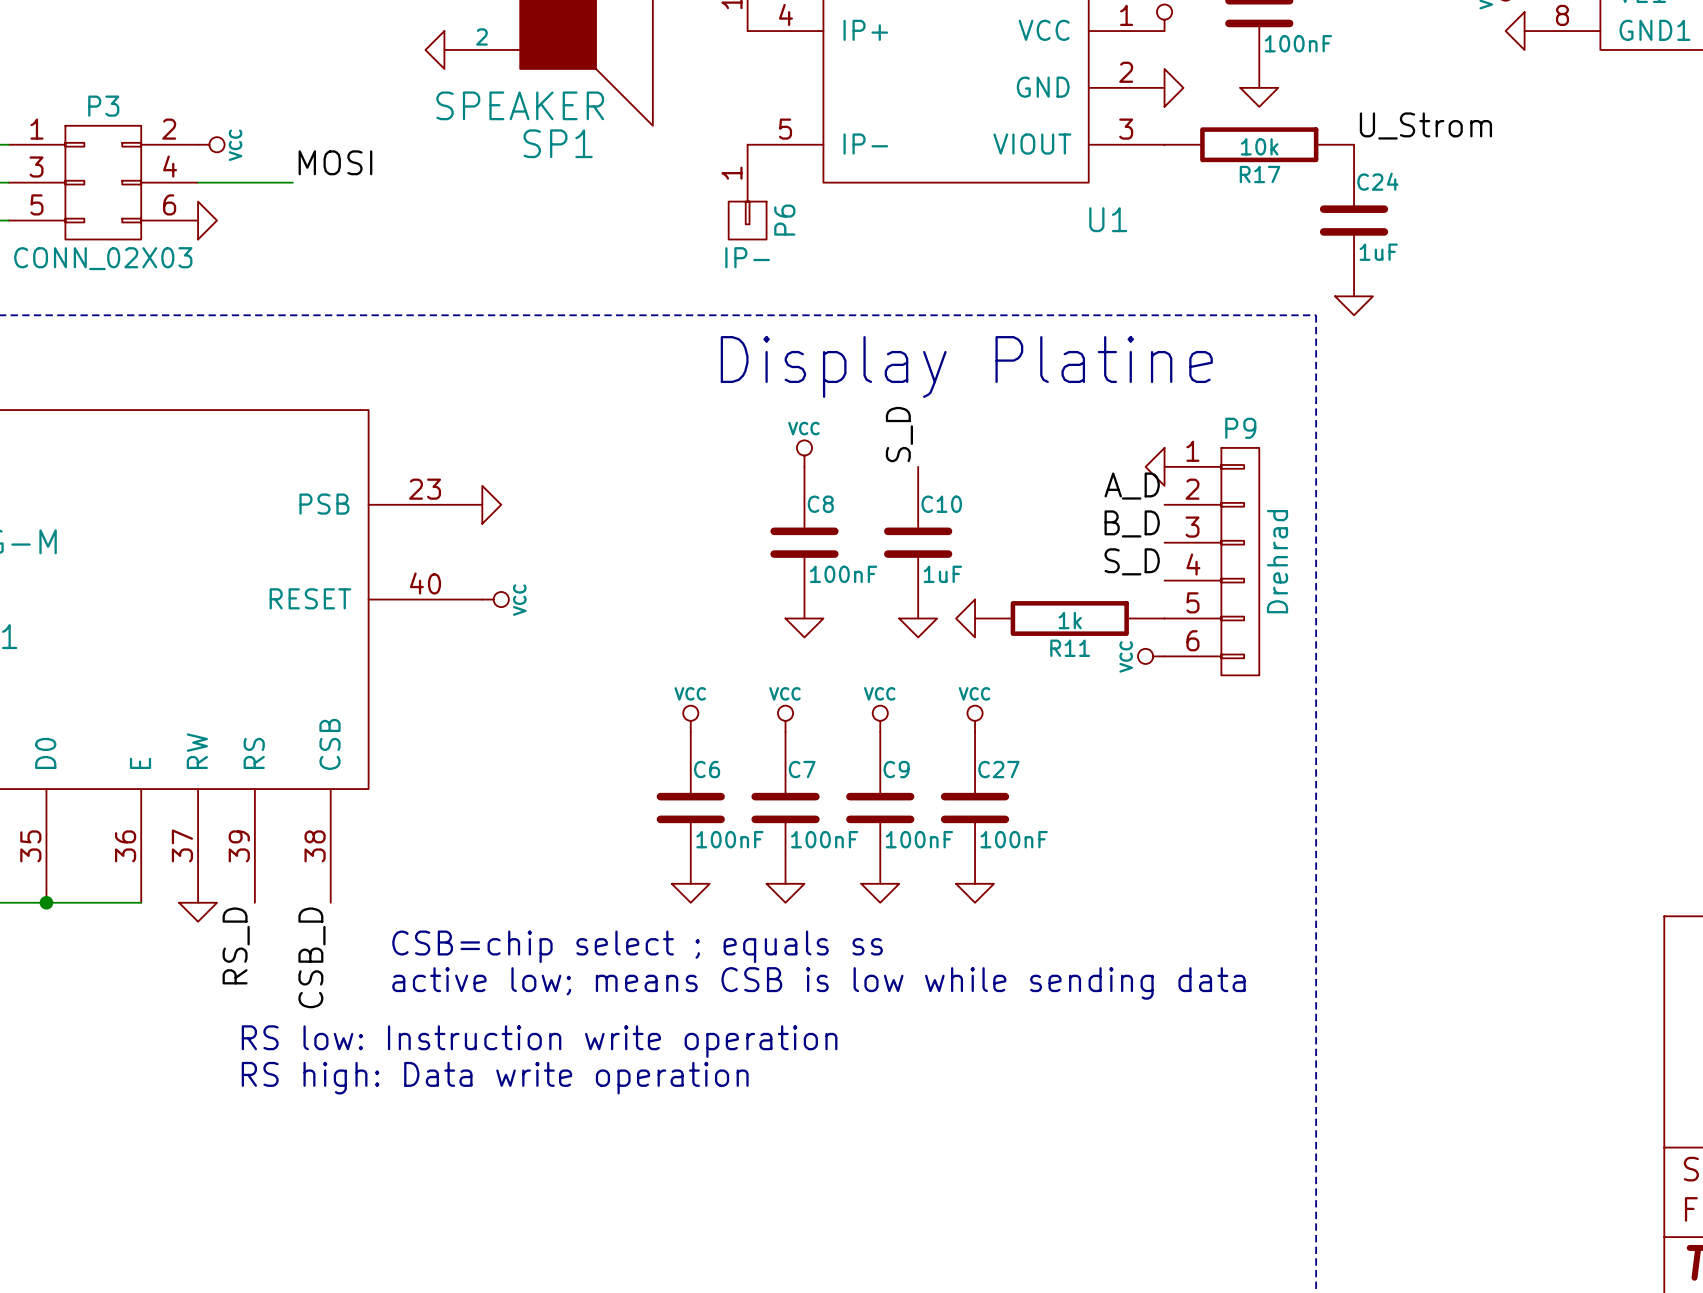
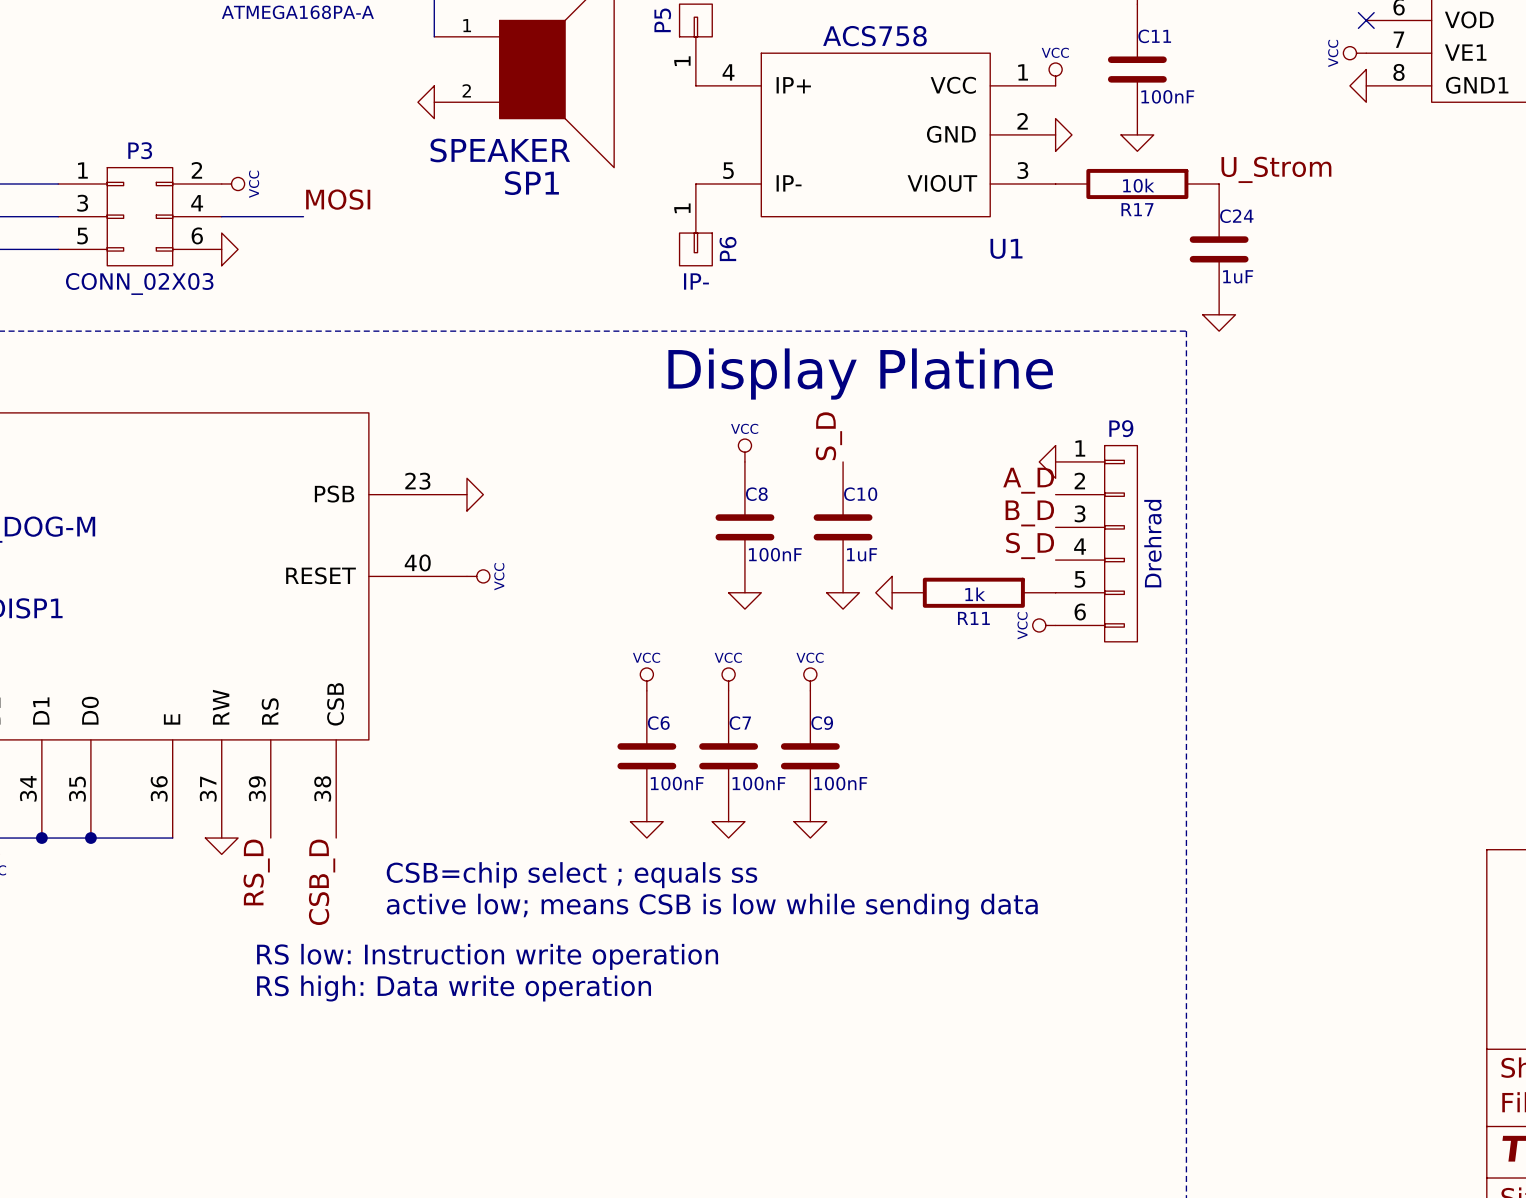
power symbol: VCC (975, 718) -> none
C27: 100nF (975, 808) -> none
power symbol: (975, 893) -> none

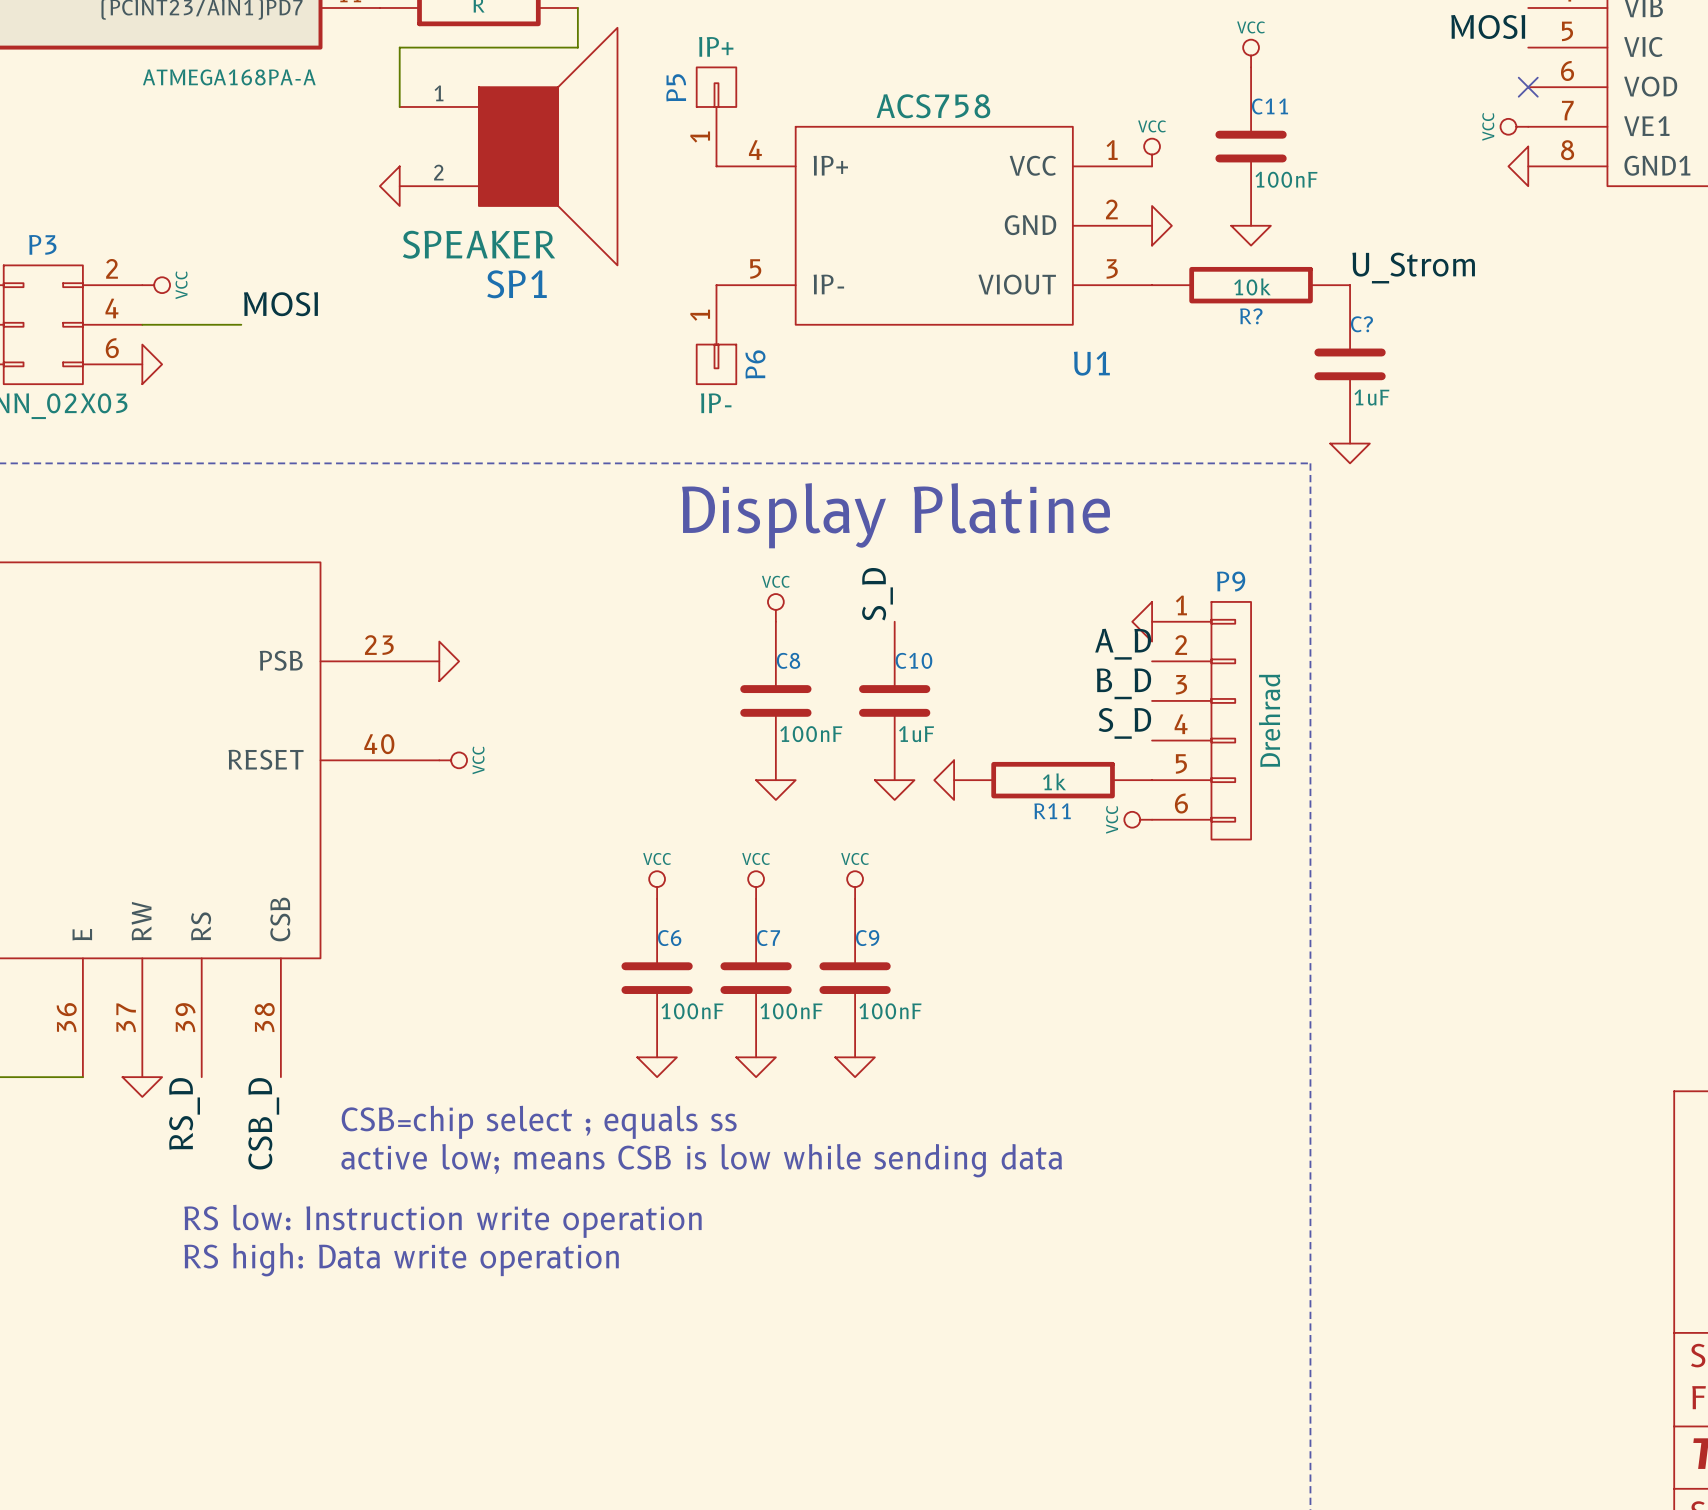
R17 name: R17 (1137, 209) -> R? (1251, 316)
C24 name: C24 (1236, 216) -> C? (1361, 324)

